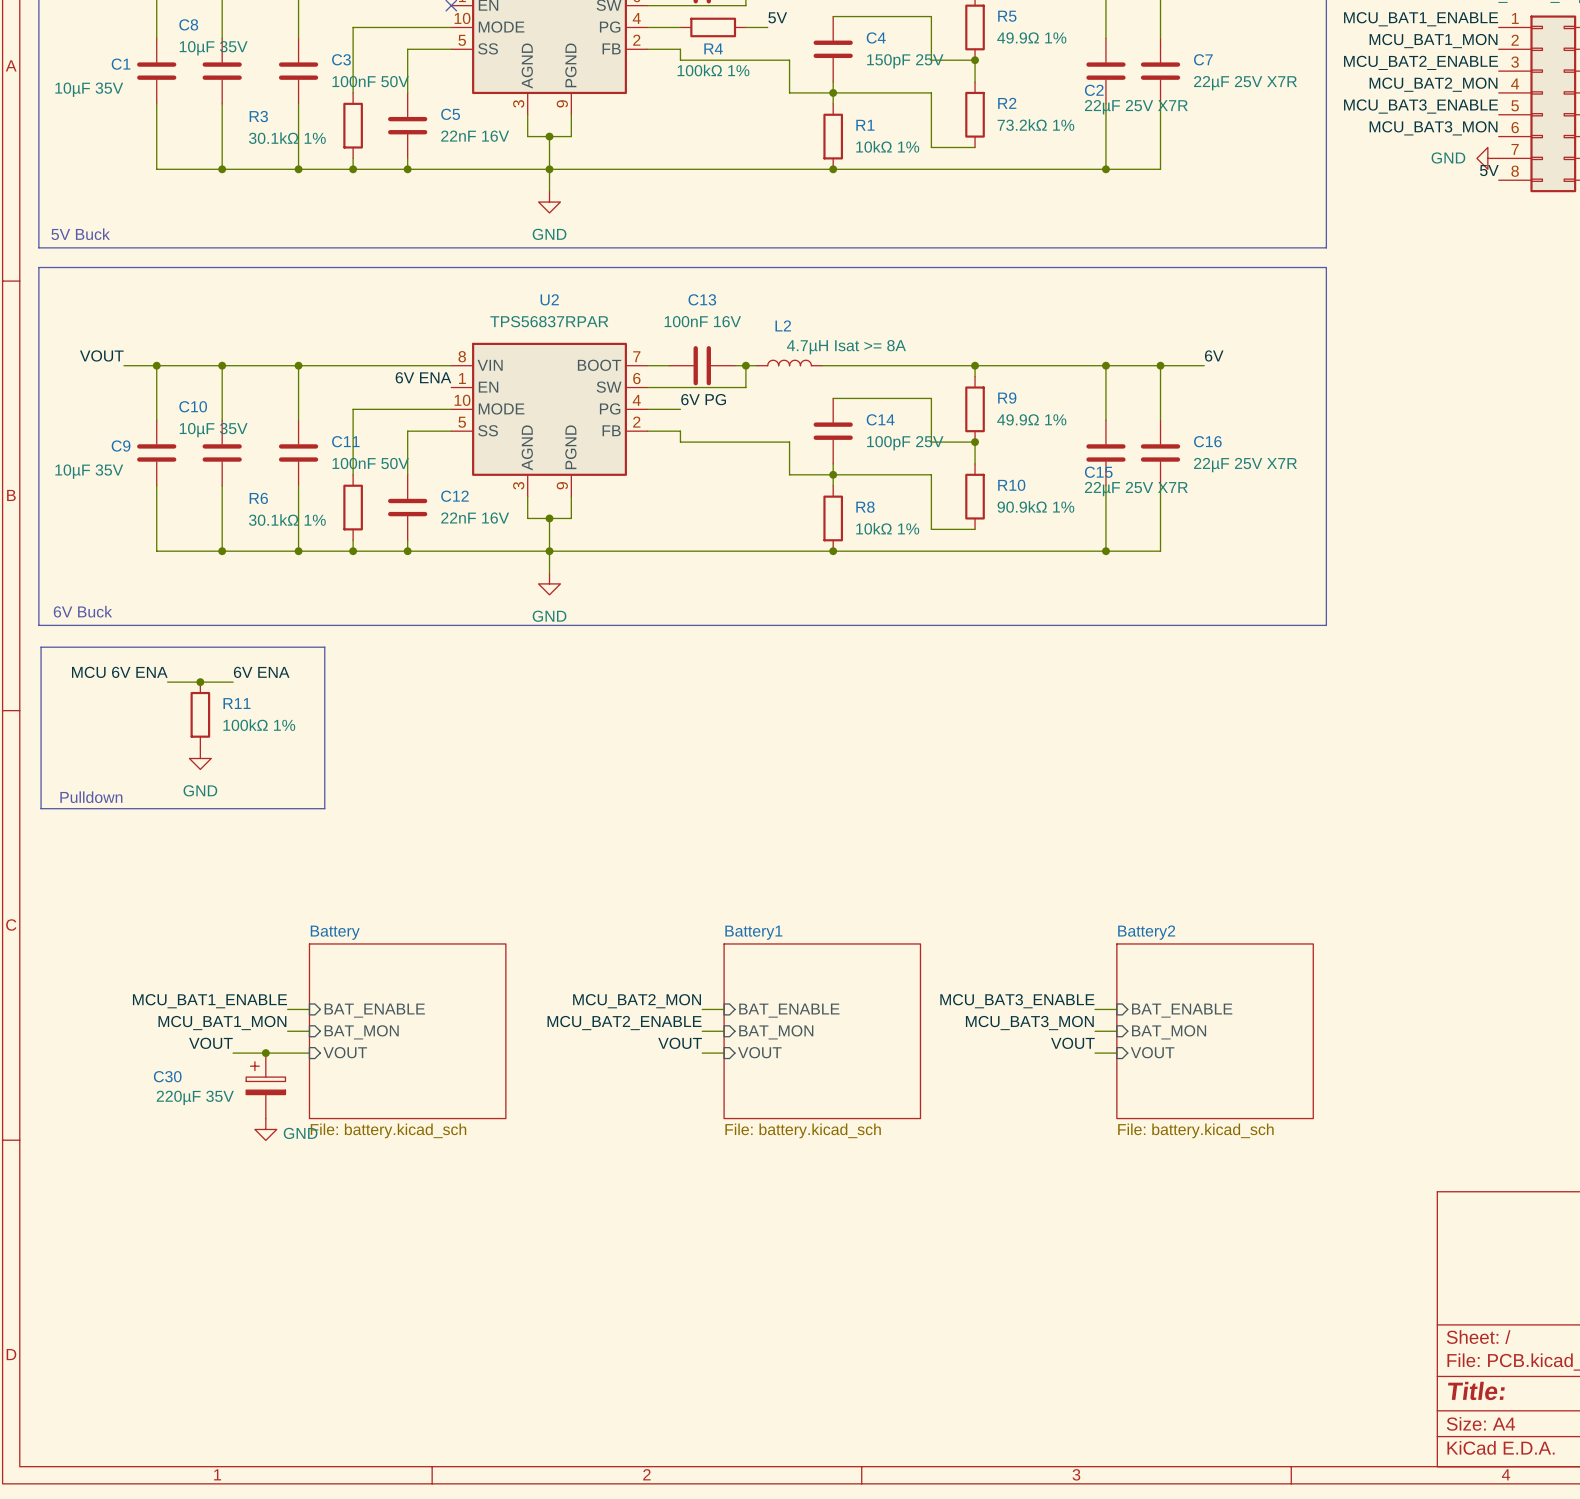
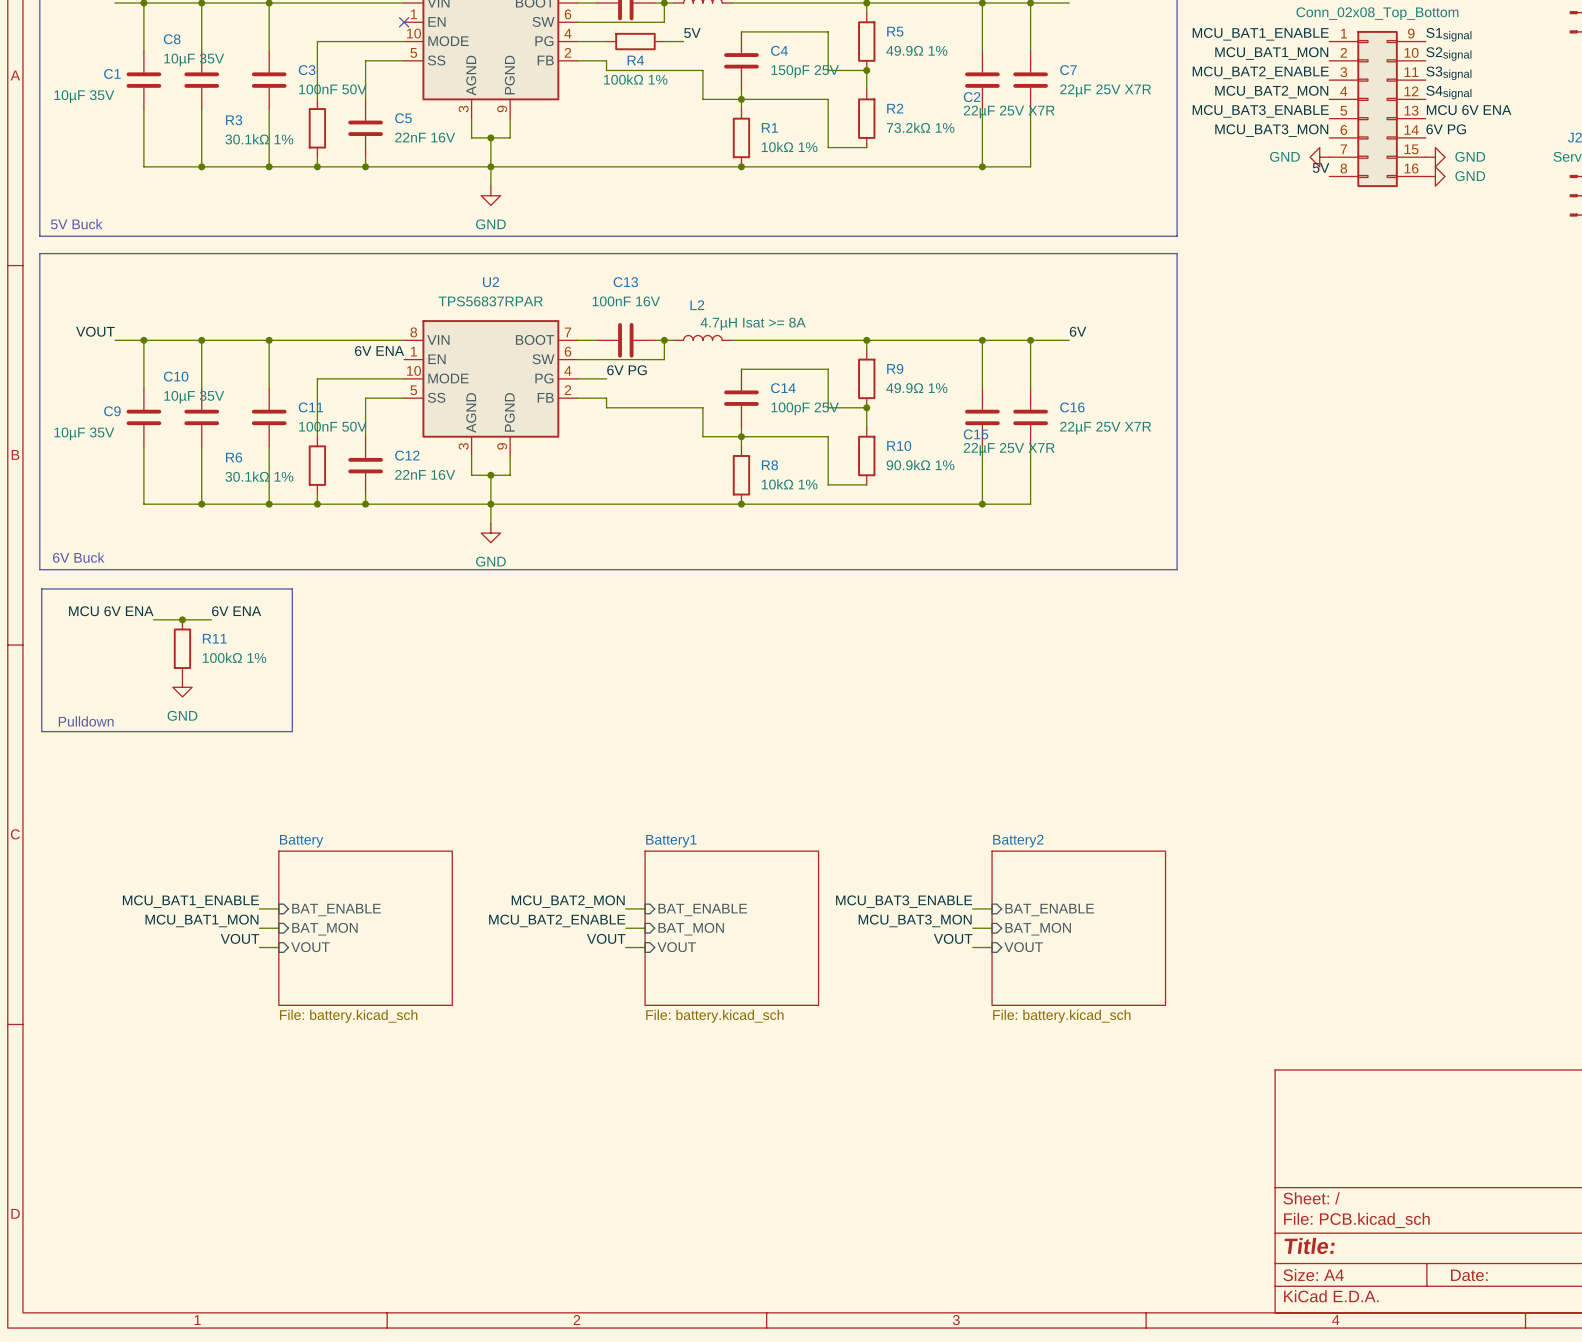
label position: VOUT (210, 1043) -> VOUT (239, 938)
wire: (233, 1053) (287, 1053) -> none
junction: (265, 1053) -> none
C30: 220µF 35V (265, 1085) -> none
power symbol: GND (265, 1129) -> none

